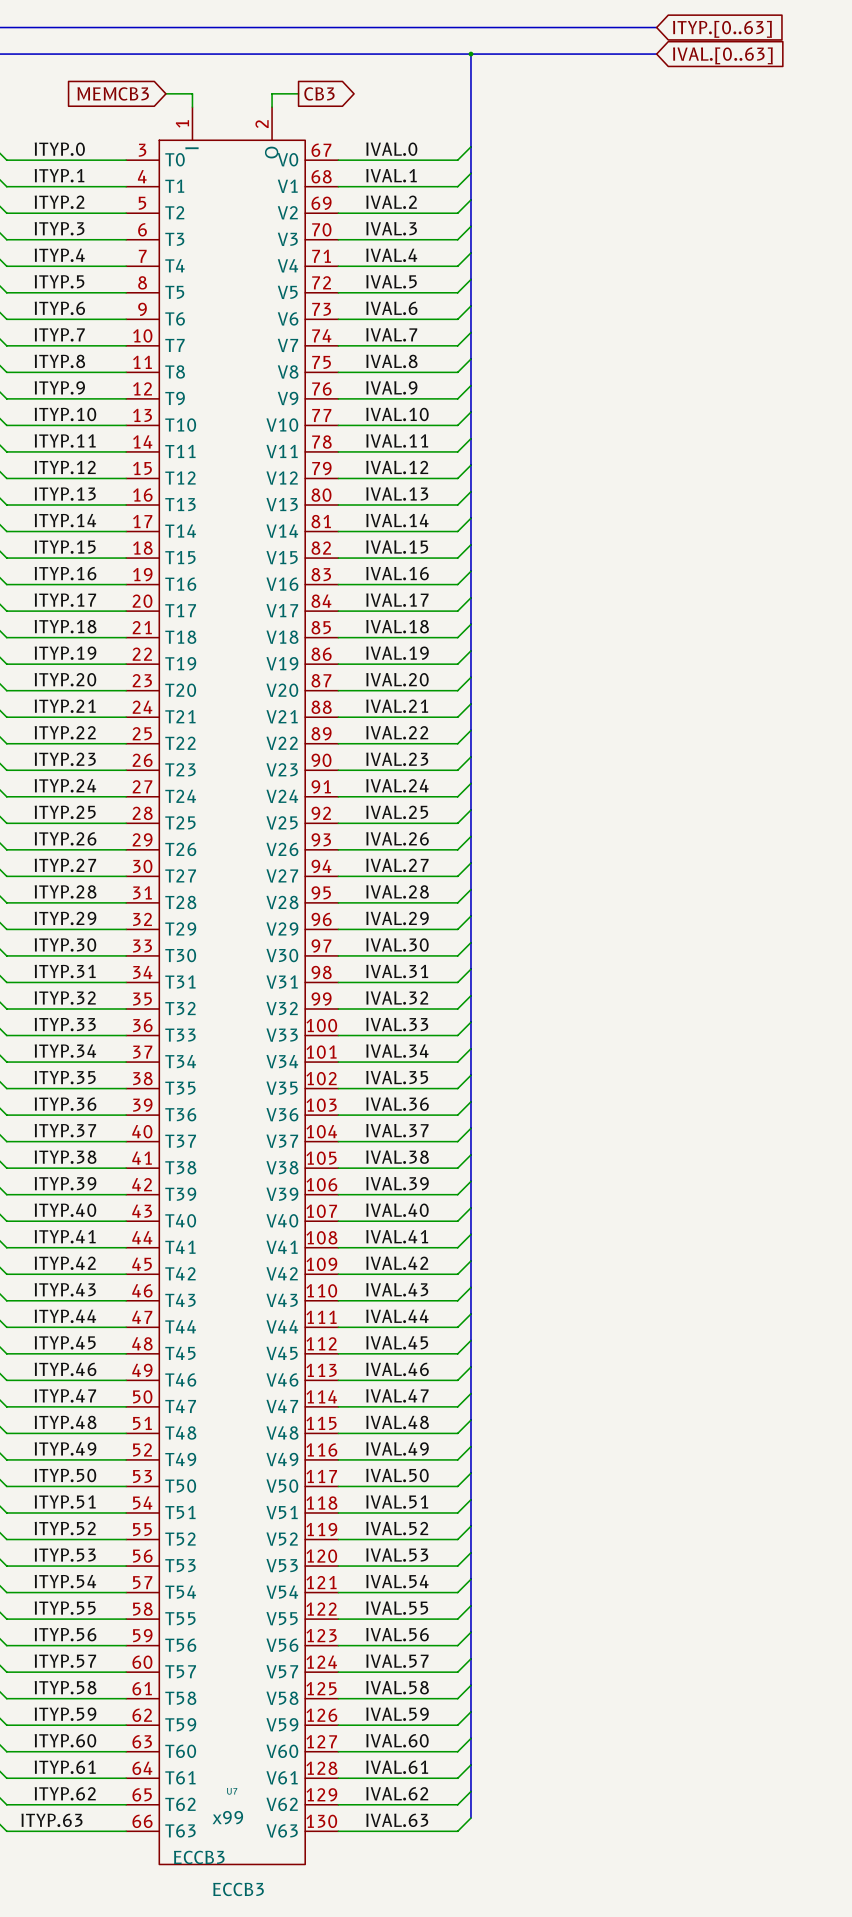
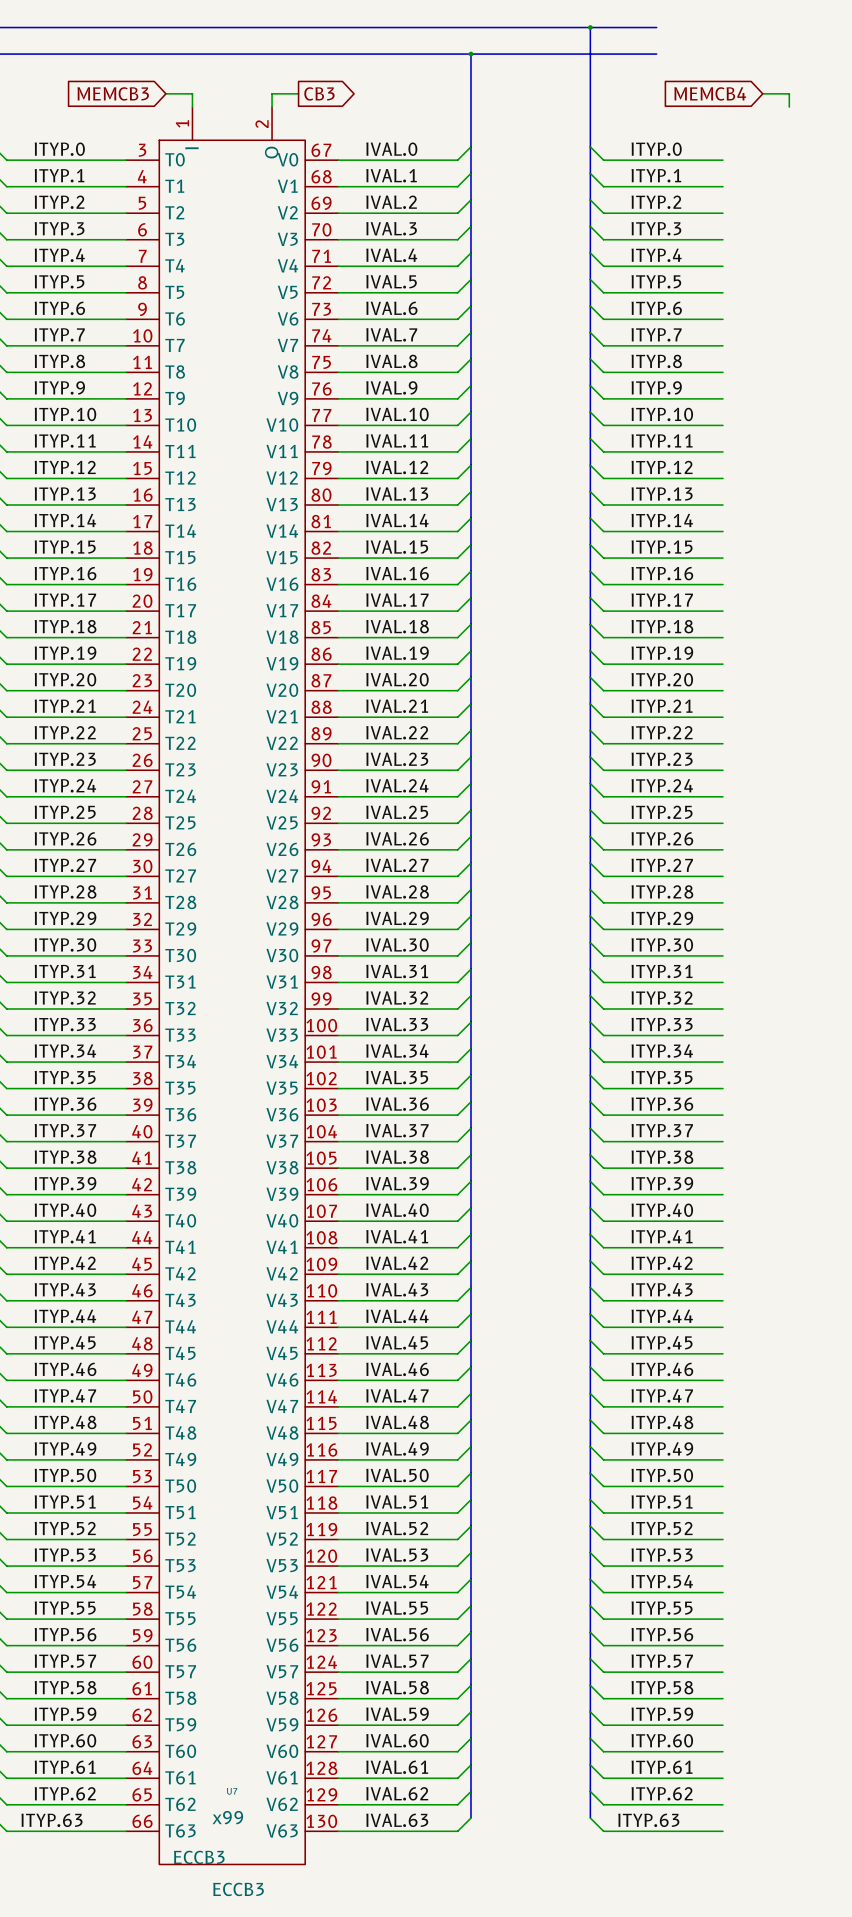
bus: none -> (590, 27) (590, 1818)
junction: none -> (590, 27)
global label: ITYP.[0..63] (722, 29) -> none
global label: IVAL.[0..63] (722, 55) -> none
global label: none -> MEMCB4 (710, 93)
wire: none -> (762, 93) (789, 93) (789, 107)
wire: none -> (590, 146) (603, 160) (722, 160)
label: none -> ITYP.0 (656, 149)
wire: none -> (590, 173) (603, 186) (722, 186)
label: none -> ITYP.1 (656, 175)
wire: none -> (590, 199) (603, 213) (722, 213)
label: none -> ITYP.2 (656, 202)
wire: none -> (590, 226) (603, 239) (722, 239)
label: none -> ITYP.3 (656, 228)
wire: none -> (590, 253) (603, 266) (722, 266)
label: none -> ITYP.4 (656, 255)
wire: none -> (590, 279) (603, 292) (722, 292)
label: none -> ITYP.5 (656, 281)
wire: none -> (590, 306) (603, 319) (722, 319)
label: none -> ITYP.6 (656, 308)
wire: none -> (590, 332) (603, 345) (722, 345)
label: none -> ITYP.7 (656, 334)
wire: none -> (590, 359) (603, 372) (722, 372)
label: none -> ITYP.8 (656, 361)
wire: none -> (590, 385) (603, 398) (722, 398)
label: none -> ITYP.9 (656, 387)
wire: none -> (590, 412) (603, 425) (722, 425)
label: none -> ITYP.10 (662, 414)
wire: none -> (590, 438) (603, 451) (722, 451)
label: none -> ITYP.11 (662, 440)
wire: none -> (590, 465) (603, 478) (722, 478)
label: none -> ITYP.12 (662, 467)
wire: none -> (590, 491) (603, 505) (722, 505)
label: none -> ITYP.13 (662, 494)
wire: none -> (590, 518) (603, 531) (722, 531)
label: none -> ITYP.14 (662, 520)
wire: none -> (590, 544) (603, 558) (722, 558)
label: none -> ITYP.15 (662, 547)
wire: none -> (590, 571) (603, 584) (722, 584)
label: none -> ITYP.16 (662, 573)
wire: none -> (590, 597) (603, 611) (722, 611)
label: none -> ITYP.17 (662, 600)
wire: none -> (590, 624) (603, 637) (722, 637)
label: none -> ITYP.18 (662, 626)
wire: none -> (590, 650) (603, 664) (722, 664)
label: none -> ITYP.19 (662, 653)
wire: none -> (590, 677) (603, 690) (722, 690)
label: none -> ITYP.20 (662, 679)
wire: none -> (590, 703) (603, 717) (722, 717)
label: none -> ITYP.21 (662, 706)
wire: none -> (590, 730) (603, 743) (722, 743)
label: none -> ITYP.22 (662, 732)
wire: none -> (590, 756) (603, 770) (722, 770)
label: none -> ITYP.23 (662, 759)
wire: none -> (590, 783) (603, 796) (722, 796)
label: none -> ITYP.24 (662, 785)
wire: none -> (590, 810) (603, 823) (722, 823)
label: none -> ITYP.25 (662, 812)
wire: none -> (590, 836) (603, 849) (722, 849)
label: none -> ITYP.26 (662, 838)
wire: none -> (590, 863) (603, 876) (722, 876)
label: none -> ITYP.27 (662, 865)
wire: none -> (590, 889) (603, 902) (722, 902)
label: none -> ITYP.28 (662, 891)
wire: none -> (590, 916) (603, 929) (722, 929)
label: none -> ITYP.29 (662, 918)
wire: none -> (590, 942) (603, 955) (722, 955)
label: none -> ITYP.30 (662, 944)
wire: none -> (590, 969) (603, 982) (722, 982)
label: none -> ITYP.31 (662, 971)
wire: none -> (590, 995) (603, 1008) (722, 1008)
label: none -> ITYP.32 (662, 998)
wire: none -> (590, 1022) (603, 1035) (722, 1035)
label: none -> ITYP.33 (662, 1024)
wire: none -> (590, 1048) (603, 1062) (722, 1062)
label: none -> ITYP.34 (662, 1051)
wire: none -> (590, 1075) (603, 1088) (722, 1088)
label: none -> ITYP.35 (662, 1077)
wire: none -> (590, 1101) (603, 1115) (722, 1115)
label: none -> ITYP.36 (662, 1104)
wire: none -> (590, 1128) (603, 1141) (722, 1141)
label: none -> ITYP.37 (662, 1130)
wire: none -> (590, 1154) (603, 1168) (722, 1168)
label: none -> ITYP.38 (662, 1157)
wire: none -> (590, 1181) (603, 1194) (722, 1194)
label: none -> ITYP.39 (662, 1183)
wire: none -> (590, 1207) (603, 1221) (722, 1221)
label: none -> ITYP.40 (662, 1210)
wire: none -> (590, 1234) (603, 1247) (722, 1247)
label: none -> ITYP.41 (662, 1236)
wire: none -> (590, 1260) (603, 1274) (722, 1274)
label: none -> ITYP.42 (662, 1263)
wire: none -> (590, 1287) (603, 1300) (722, 1300)
label: none -> ITYP.43 (662, 1289)
wire: none -> (590, 1314) (603, 1327) (722, 1327)
label: none -> ITYP.44 (662, 1316)
wire: none -> (590, 1340) (603, 1353) (722, 1353)
label: none -> ITYP.45 (662, 1342)
wire: none -> (590, 1367) (603, 1380) (722, 1380)
label: none -> ITYP.46 (662, 1369)
wire: none -> (590, 1393) (603, 1406) (722, 1406)
label: none -> ITYP.47 (662, 1395)
wire: none -> (590, 1420) (603, 1433) (722, 1433)
label: none -> ITYP.48 (662, 1422)
wire: none -> (590, 1446) (603, 1459) (722, 1459)
label: none -> ITYP.49 (662, 1448)
wire: none -> (590, 1473) (603, 1486) (722, 1486)
label: none -> ITYP.50 (662, 1475)
wire: none -> (590, 1499) (603, 1512) (722, 1512)
label: none -> ITYP.51 (662, 1502)
wire: none -> (590, 1526) (603, 1539) (722, 1539)
label: none -> ITYP.52 (662, 1528)
wire: none -> (590, 1552) (603, 1566) (722, 1566)
label: none -> ITYP.53 (662, 1555)
wire: none -> (590, 1579) (603, 1592) (722, 1592)
label: none -> ITYP.54 (662, 1581)
wire: none -> (590, 1605) (603, 1619) (722, 1619)
label: none -> ITYP.55 (662, 1608)
wire: none -> (590, 1632) (603, 1645) (722, 1645)
label: none -> ITYP.56 (662, 1634)
wire: none -> (590, 1658) (603, 1672) (722, 1672)
label: none -> ITYP.57 (662, 1661)
wire: none -> (590, 1685) (603, 1698) (722, 1698)
label: none -> ITYP.58 (662, 1687)
wire: none -> (590, 1711) (603, 1725) (722, 1725)
label: none -> ITYP.59 (662, 1714)
wire: none -> (590, 1738) (603, 1751) (722, 1751)
label: none -> ITYP.60 (662, 1740)
wire: none -> (590, 1764) (603, 1778) (722, 1778)
label: none -> ITYP.61 (662, 1767)
wire: none -> (590, 1791) (603, 1804) (722, 1804)
label: none -> ITYP.62 (662, 1793)
wire: none -> (590, 1818) (603, 1831) (722, 1831)
label: none -> ITYP.63 (648, 1820)

